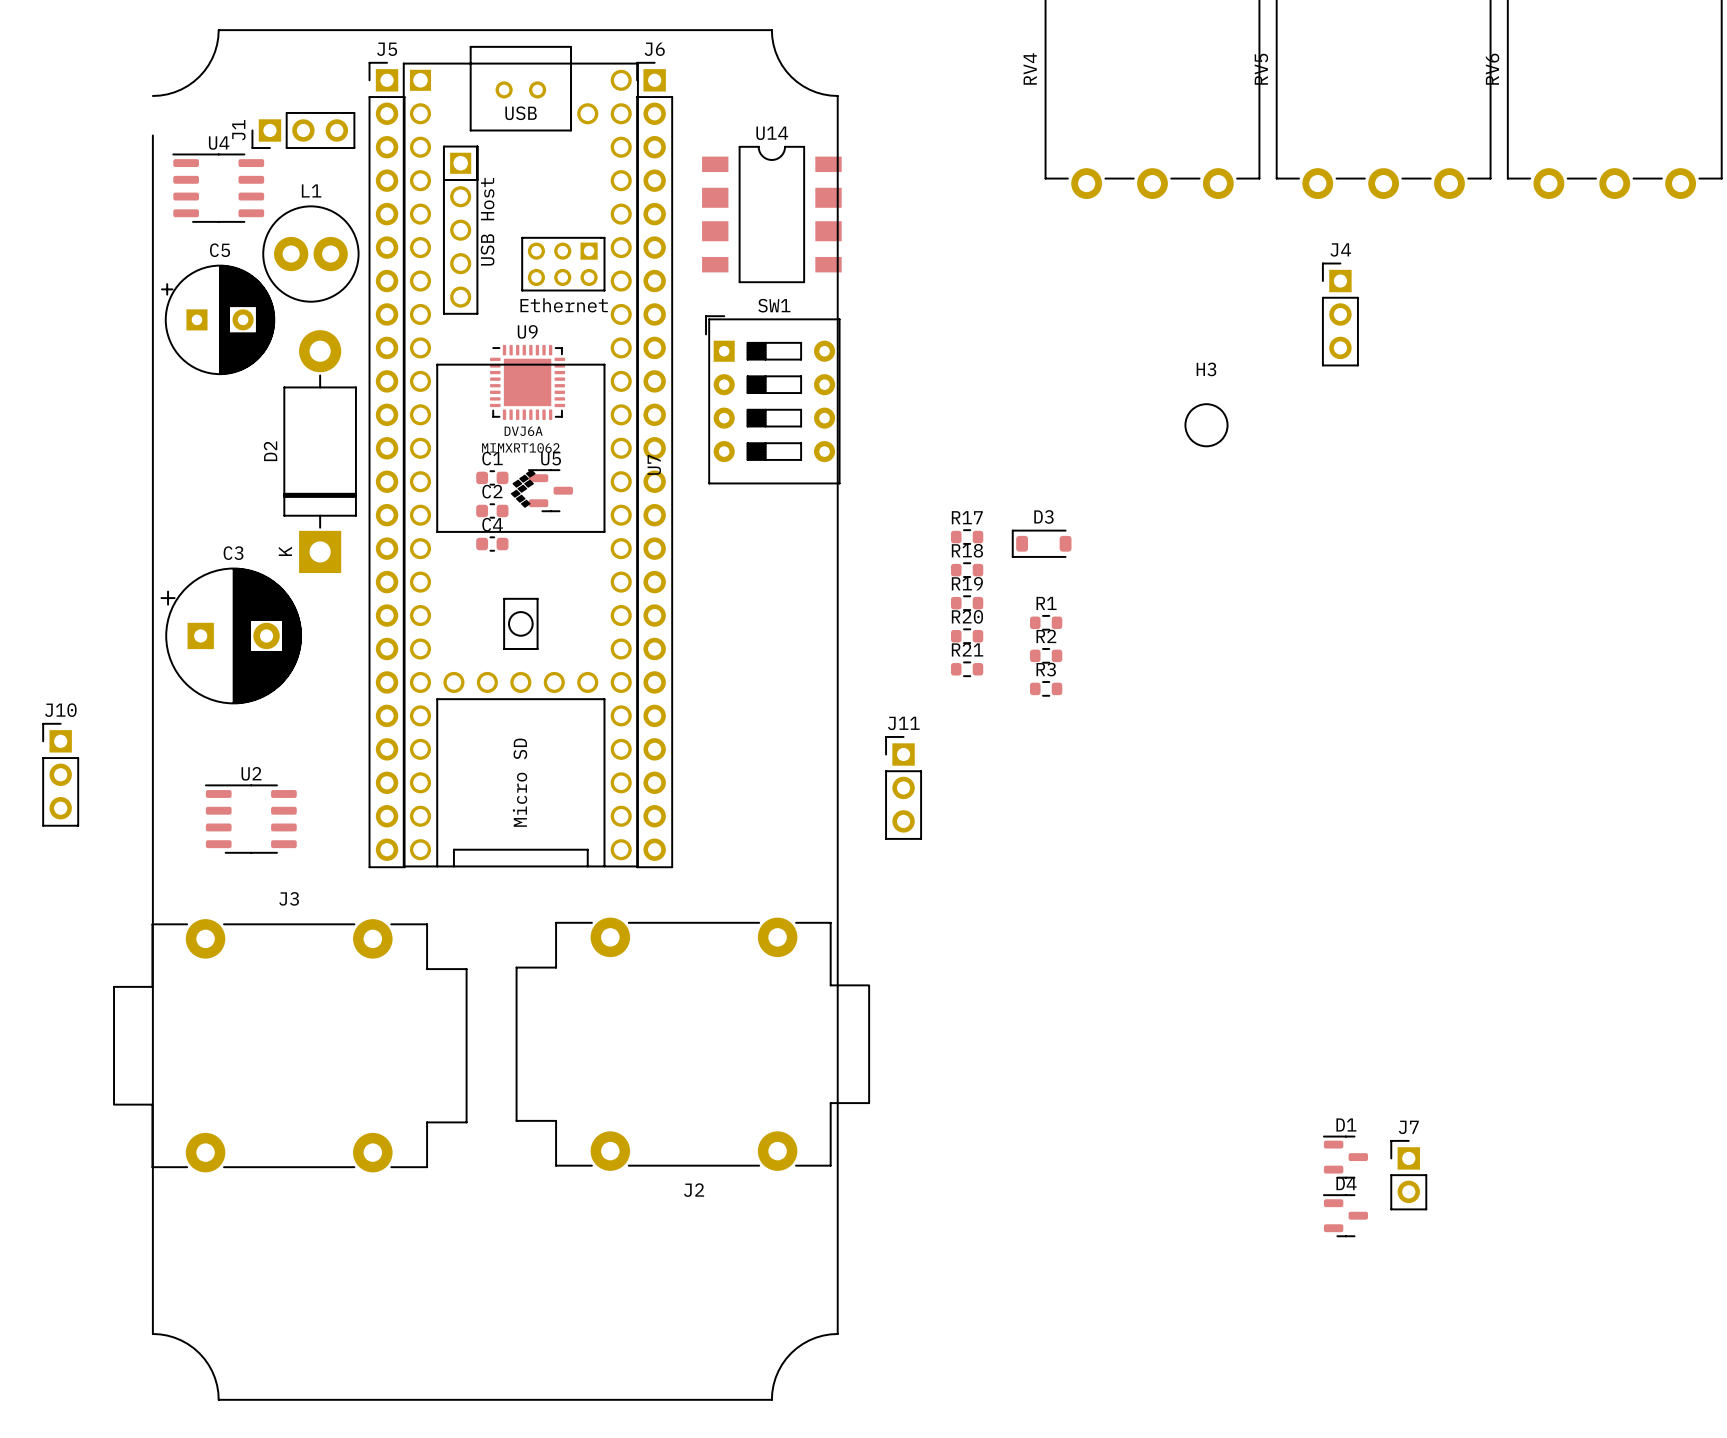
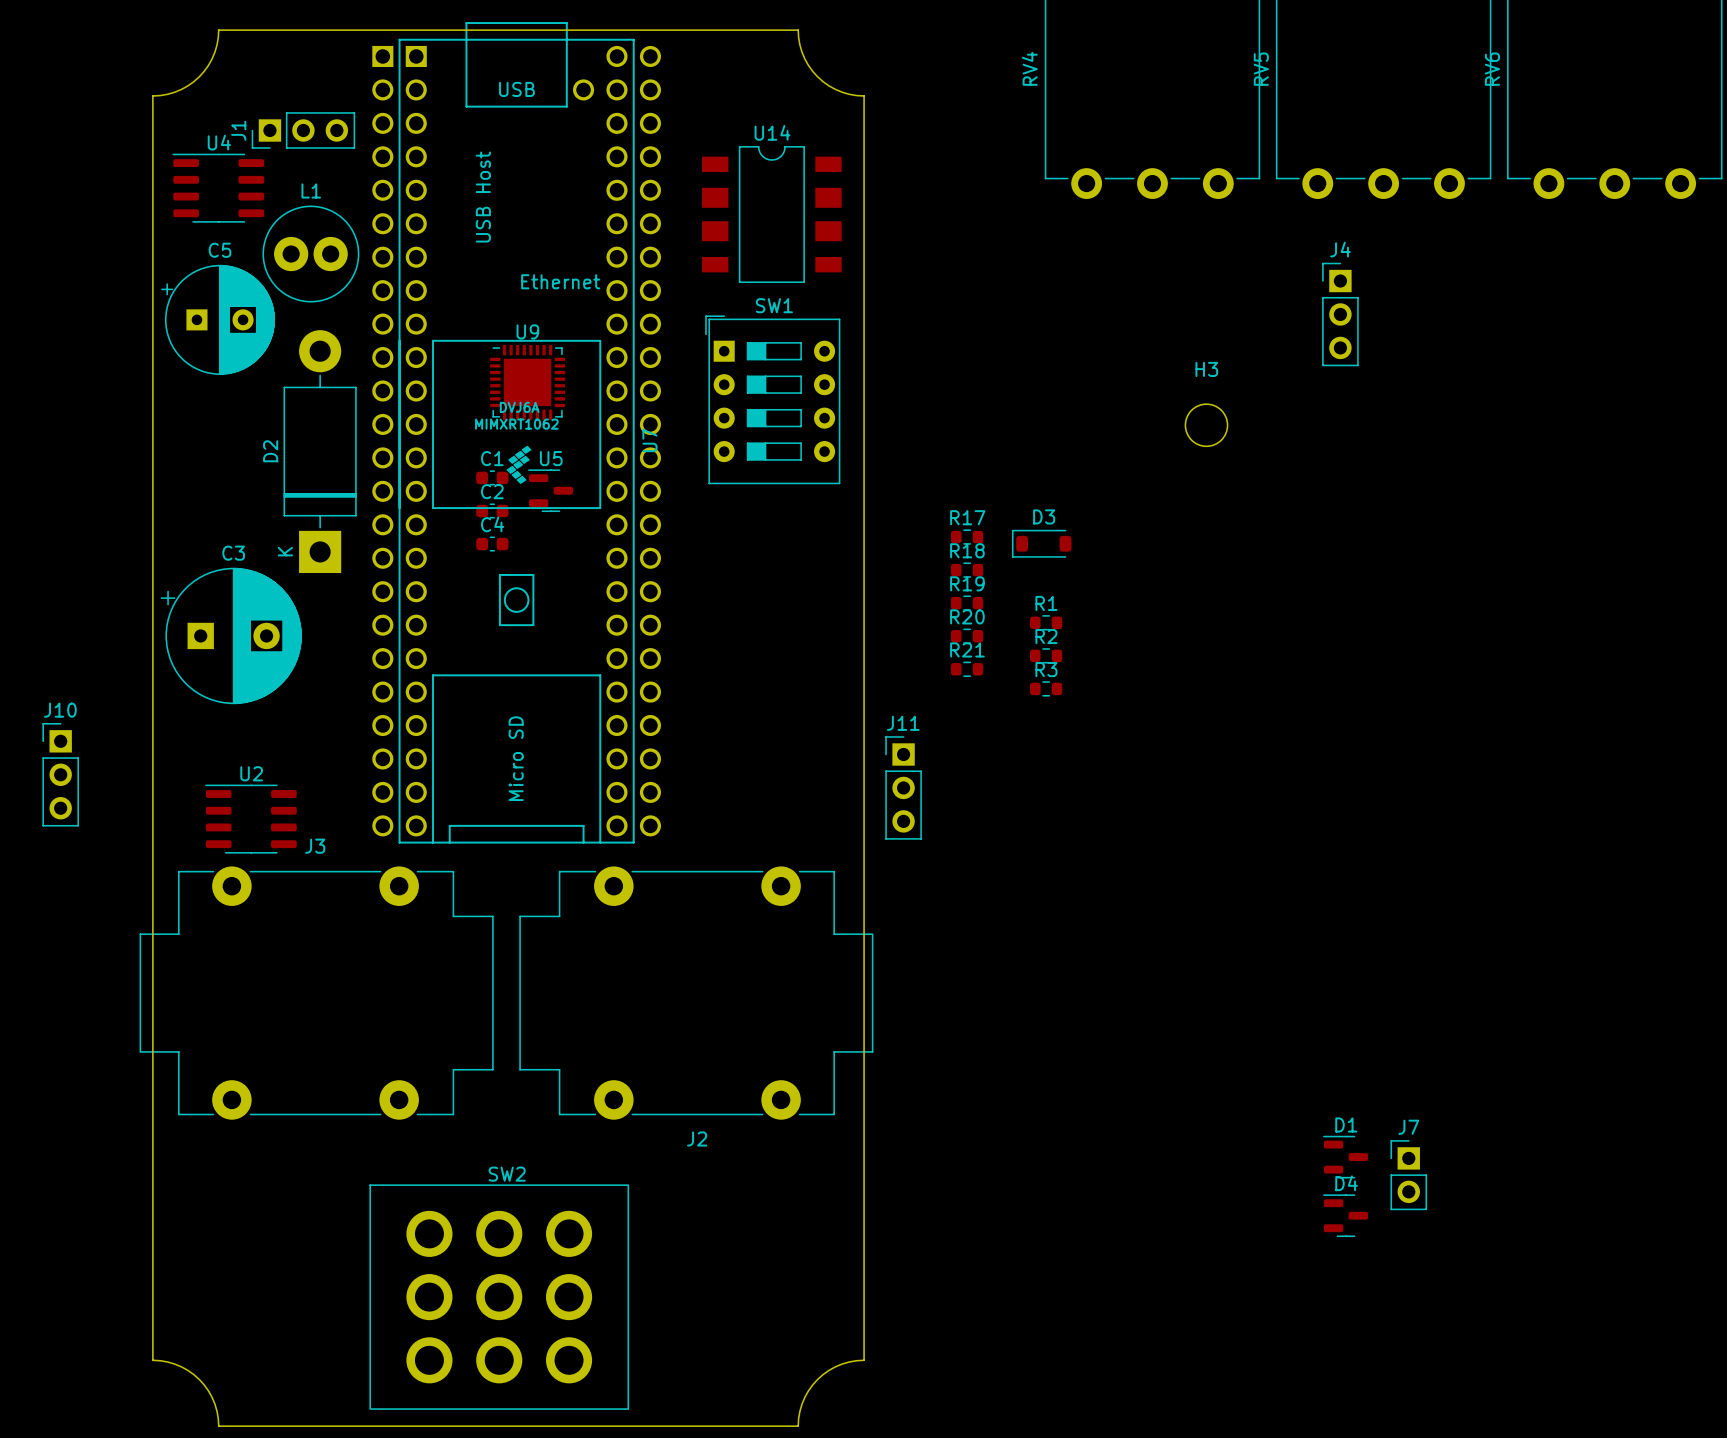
board edge: (771, 30) (773, 44) (778, 58) (791, 76) (802, 85) (815, 92) (837, 95) (837, 1333) (823, 1335) (809, 1340) (791, 1353) (778, 1371) (773, 1385) (771, 1399) (218, 1399) (215, 1378) (208, 1364) (199, 1353) (181, 1340) (167, 1335) (152, 1333) -> (771, 30) (798, 30) (799, 44) (804, 58) (817, 76) (835, 89) (849, 94) (864, 95) (864, 1360) (842, 1364) (829, 1370) (817, 1379) (804, 1397) (799, 1411) (798, 1426) (218, 1426) (215, 1404) (208, 1391) (199, 1379) (187, 1370) (174, 1364) (152, 1360) (152, 1333)
U7 footprint: [402, 45, 639, 868] -> [372, 22, 661, 844]
board edge: none -> (152, 95) (152, 135)
J5: (387, 465) -> none
J6: (654, 465) -> none
J2 position: (692, 1044) -> (696, 993)
J3 position: (290, 1045) -> (316, 993)
SW2: none -> (499, 1297)

